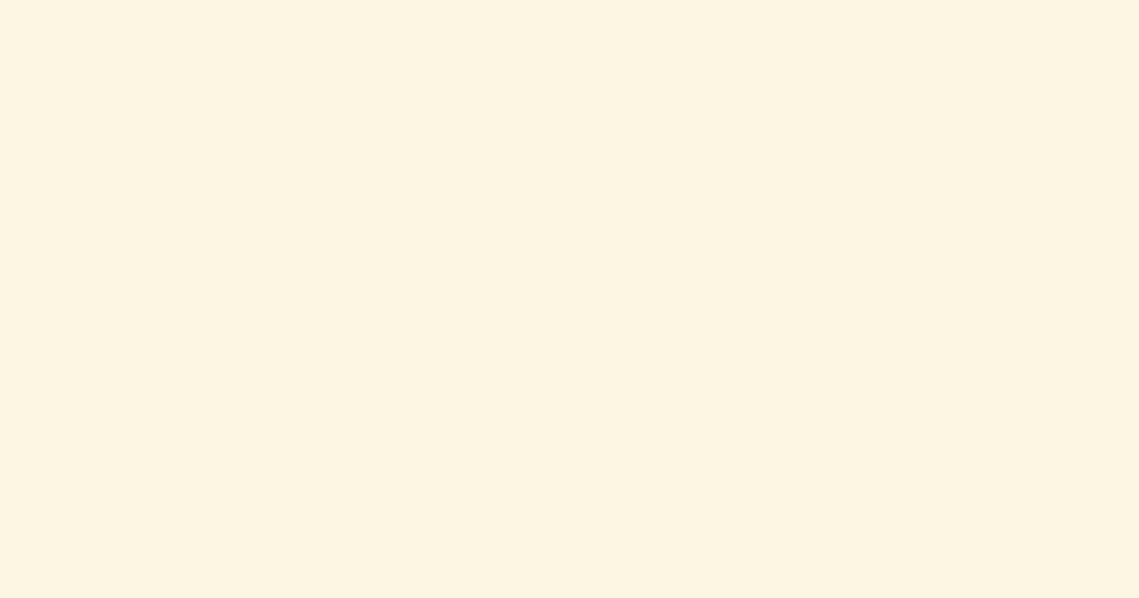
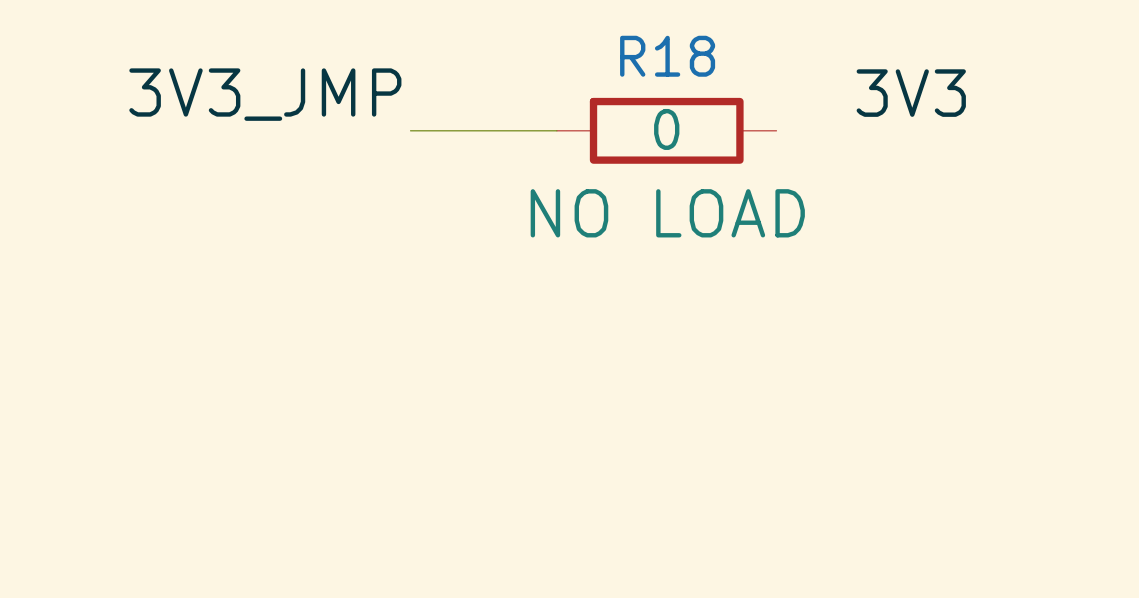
label: none -> 3V3 (911, 93)
label: none -> 3V3_JMP (265, 94)
wire: none -> (410, 130) (556, 130)
R18: none -> 0 (666, 130)

